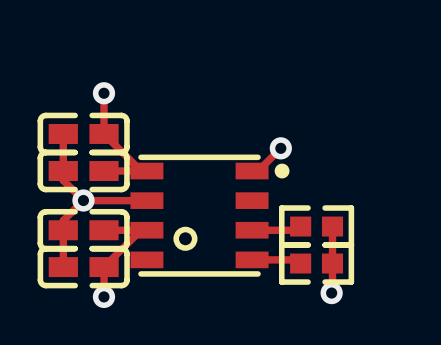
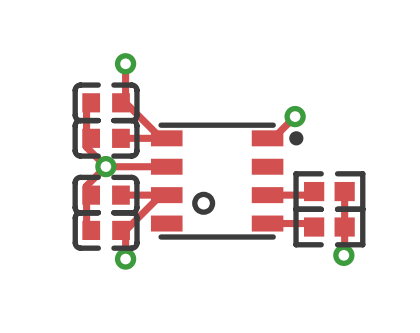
part footprint: [37, 112, 130, 156] -> [72, 82, 140, 124]
part footprint: [37, 149, 130, 193] -> [72, 117, 140, 159]
part footprint: [37, 208, 130, 252] -> [72, 174, 140, 216]
part footprint: [37, 245, 130, 289] -> [72, 210, 140, 251]

